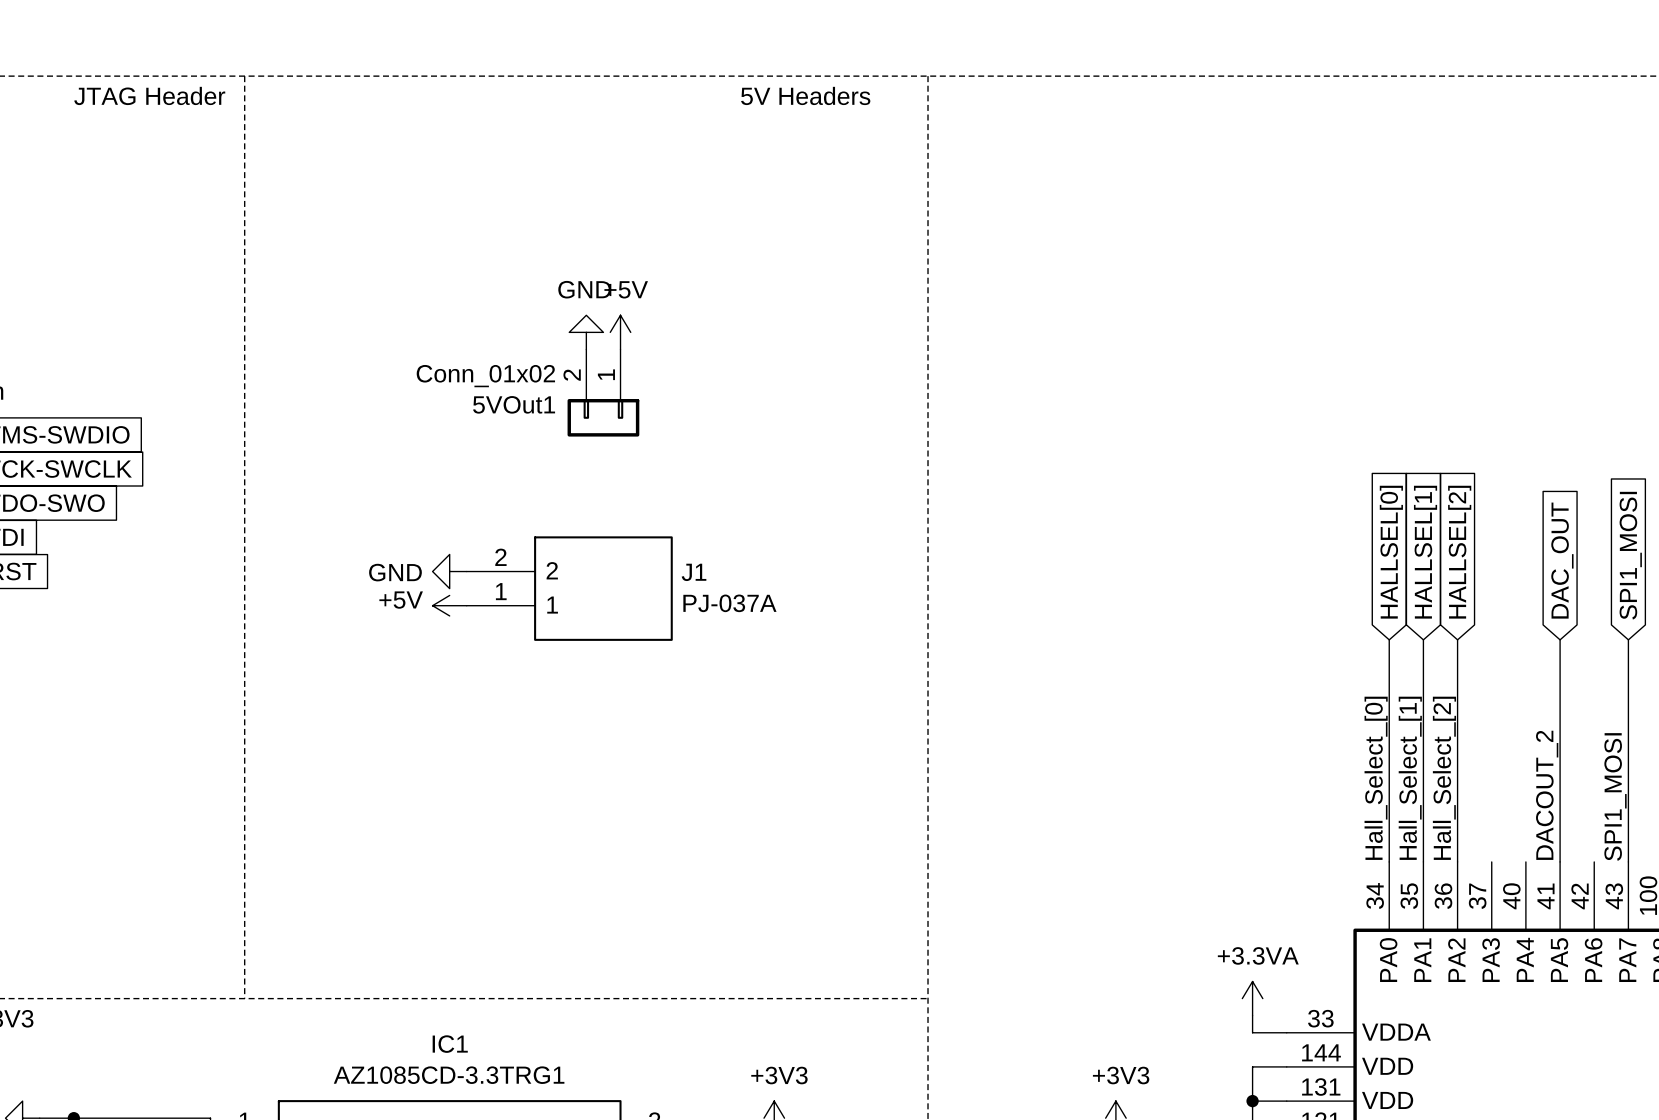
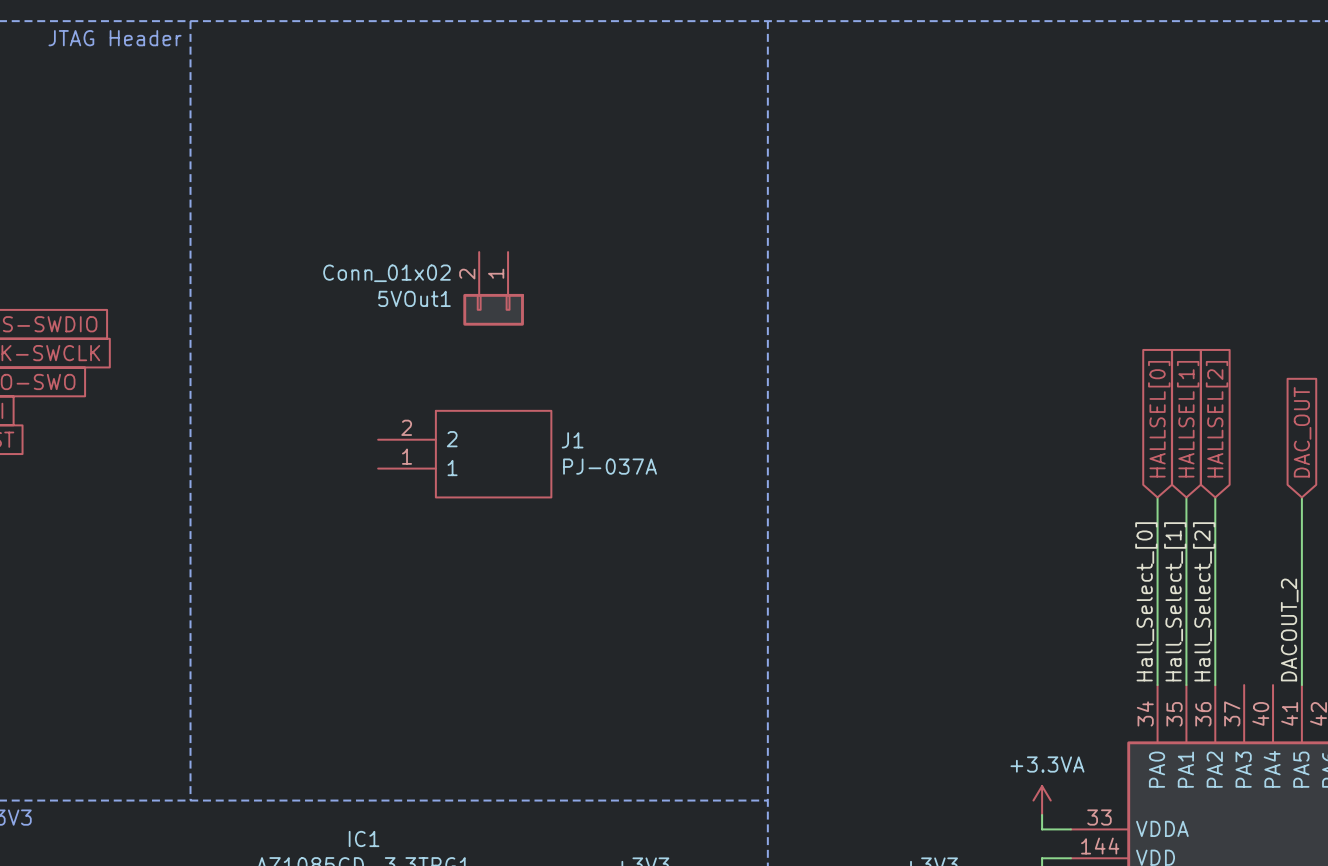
text: 5V Headers (805, 95) -> none
power symbol: GND (586, 332) -> none
power symbol: +5V (620, 332) -> none
power symbol: GND (449, 571) -> none
power symbol: +5V (449, 605) -> none

